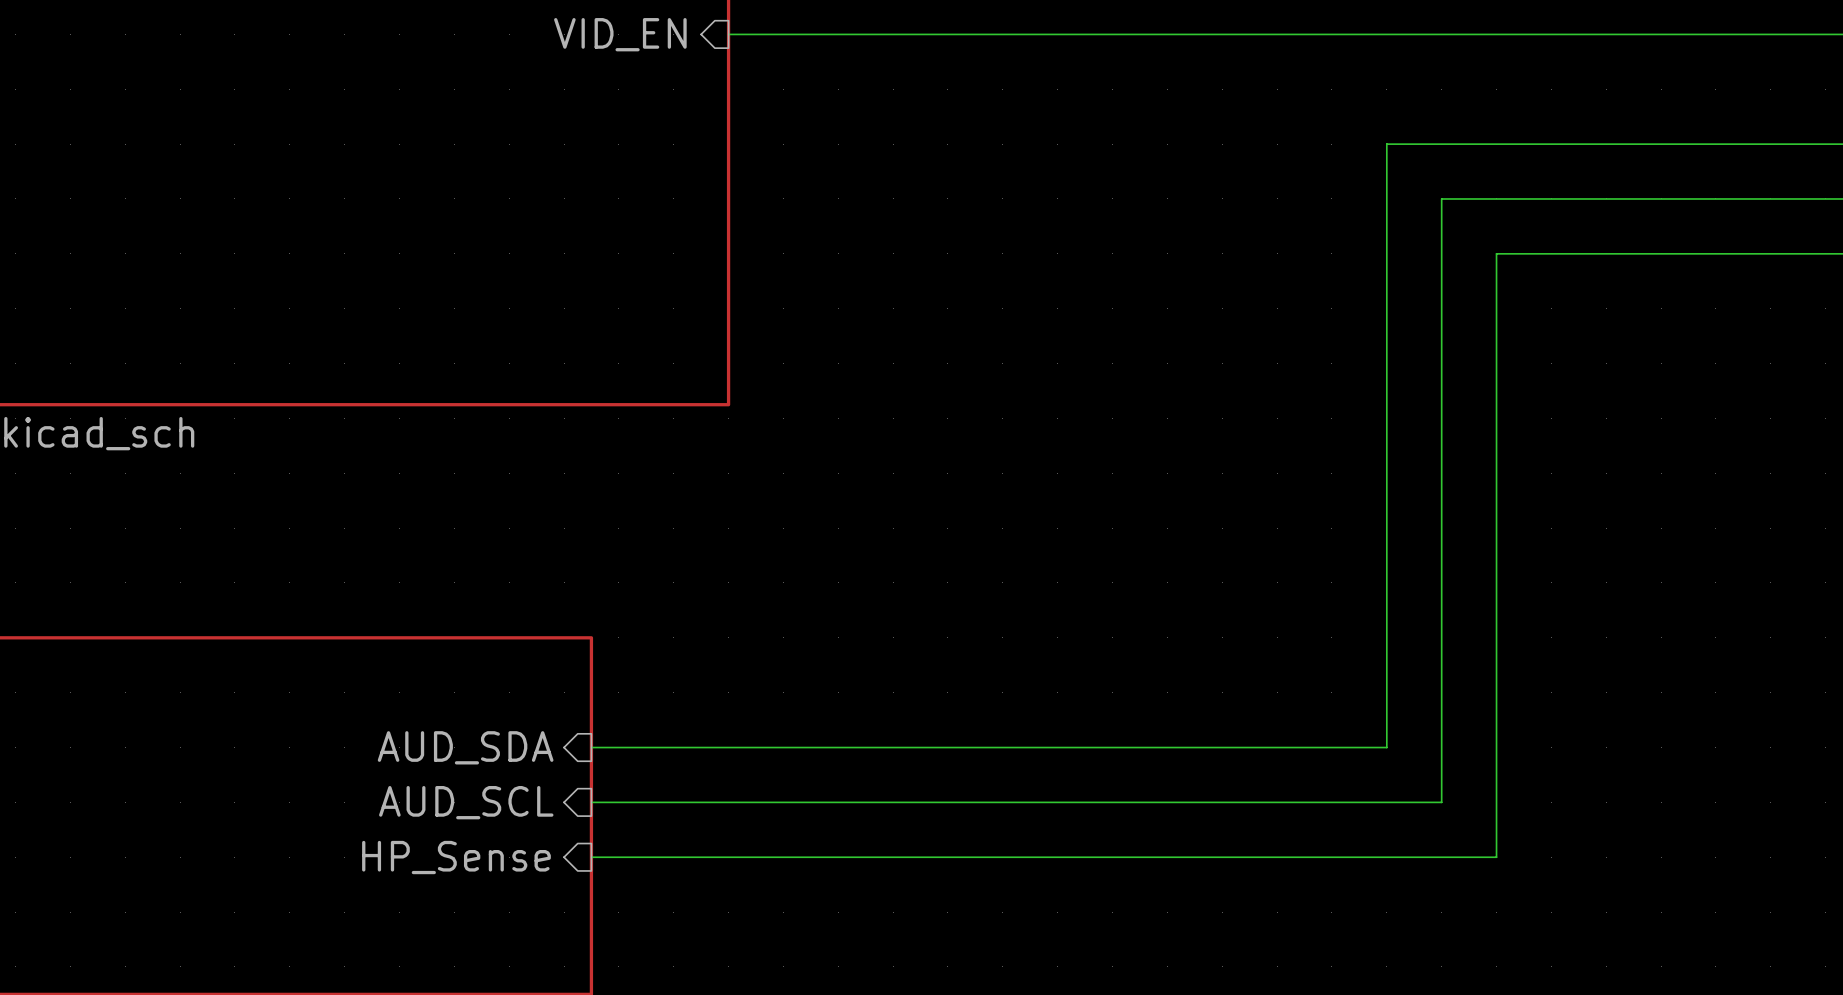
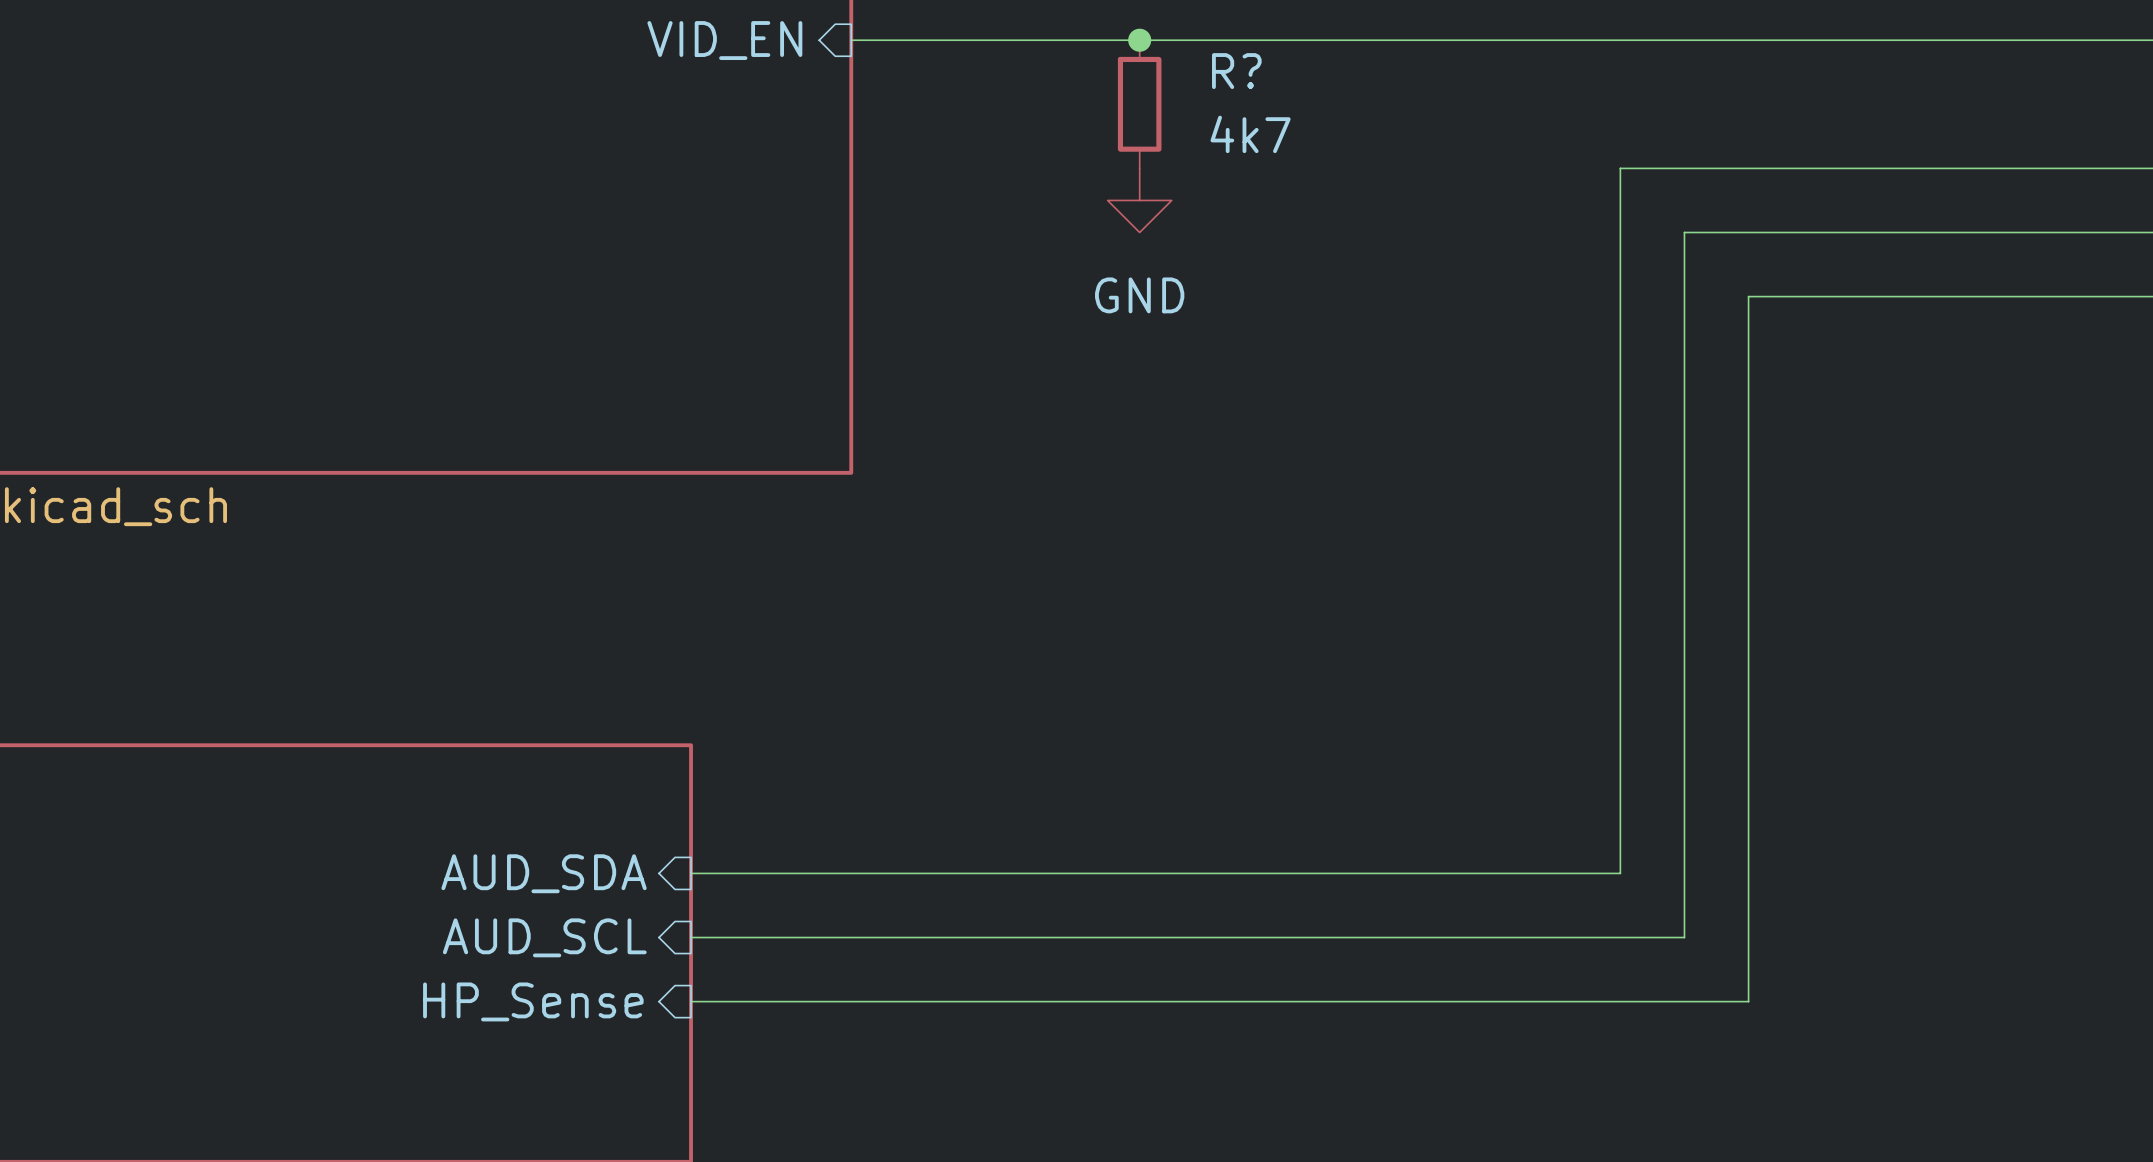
junction: none -> (1139, 40)
R?: none -> 4k7 (1139, 104)
power symbol: none -> GND (1139, 200)

